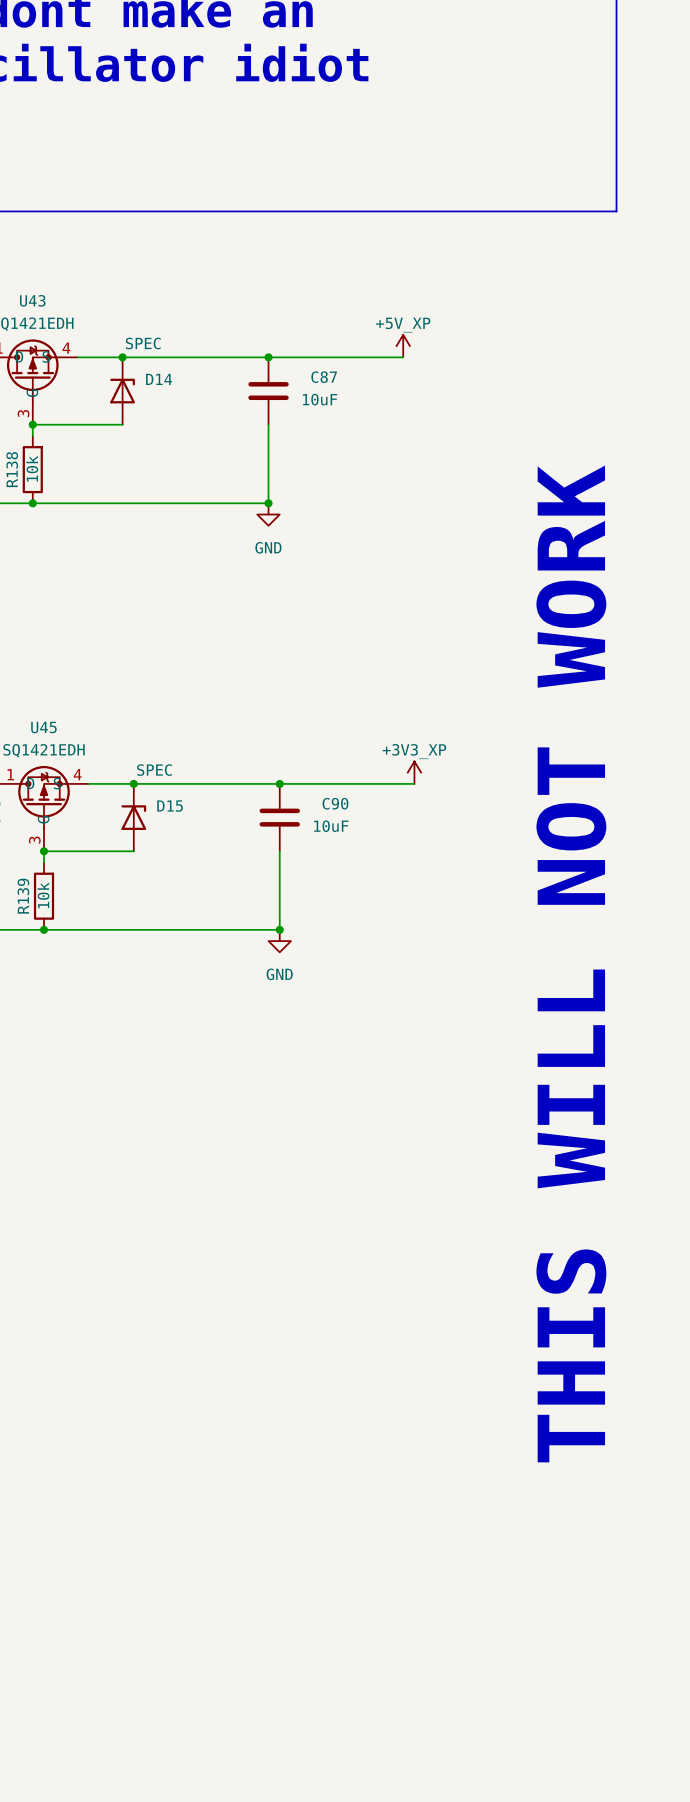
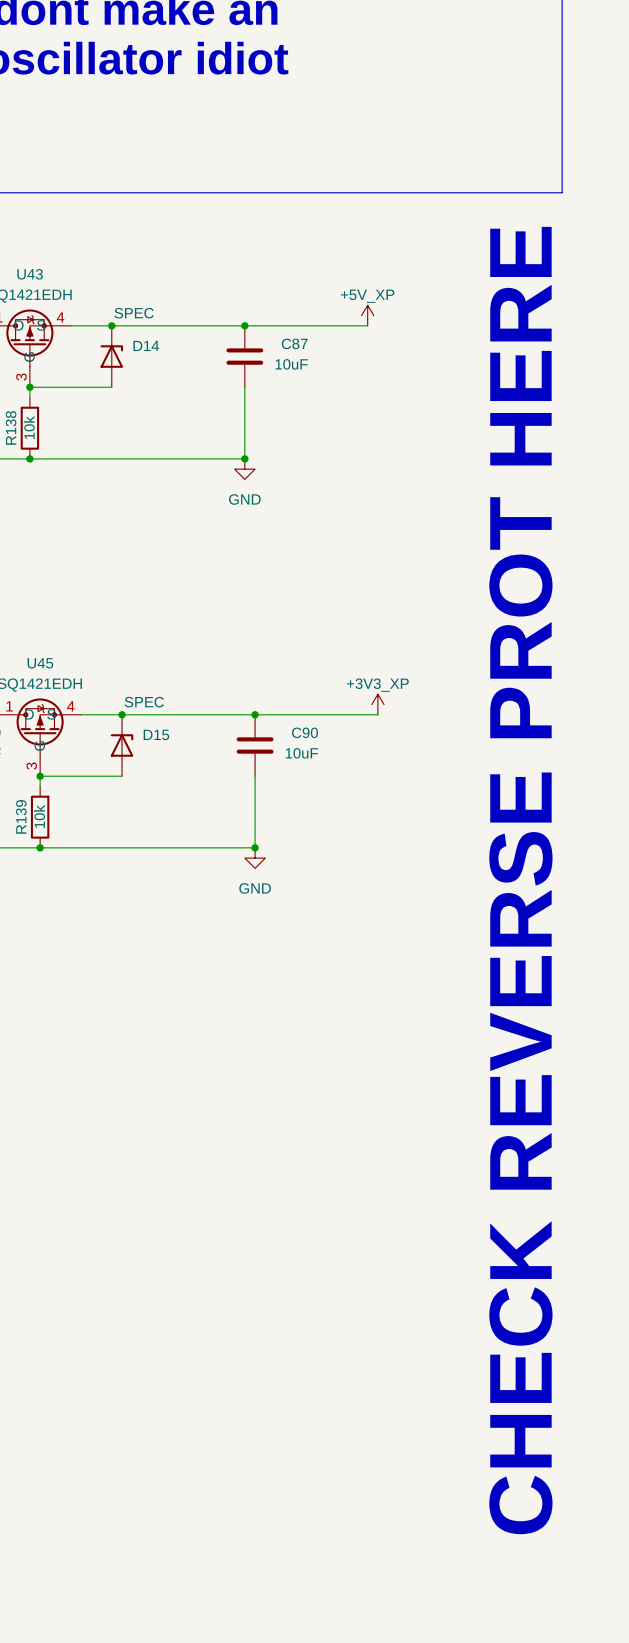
text: THIS WILL NOT WORK (571, 963) -> CHECK REVERSE PROT HERE (520, 880)

